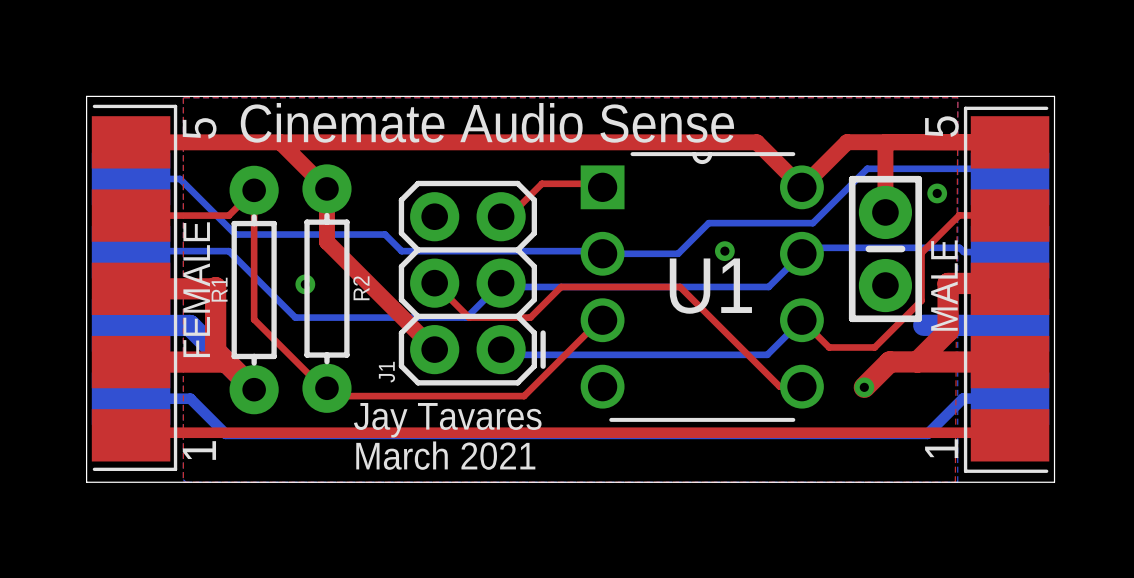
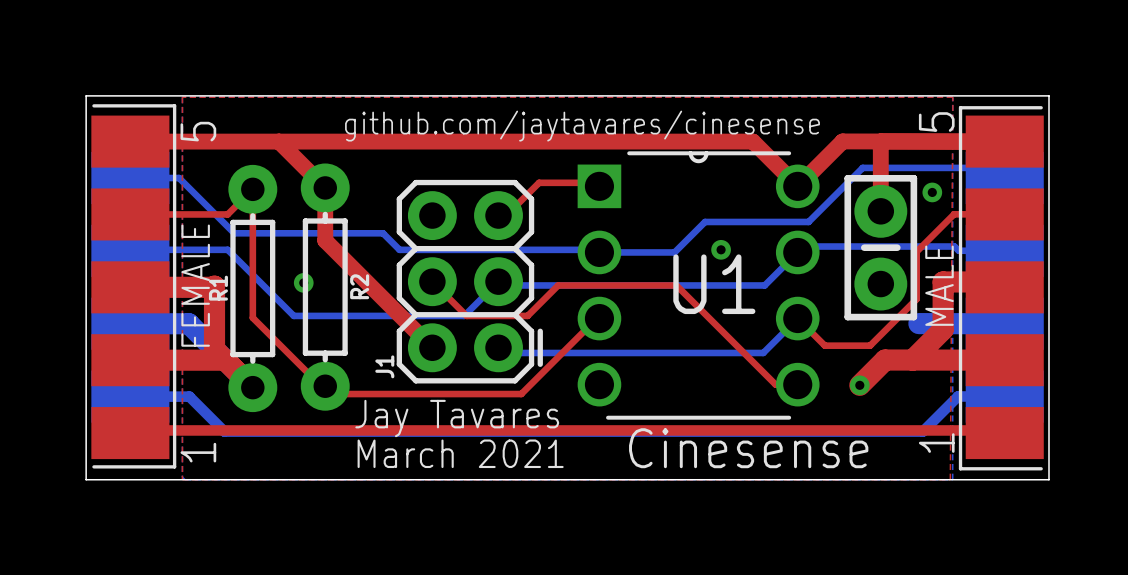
text: Cinemate Audio Sense (487, 122) -> none
text: none -> github.com/jaytavares/cinesense (582, 126)
text: none -> Cinesense (748, 448)

